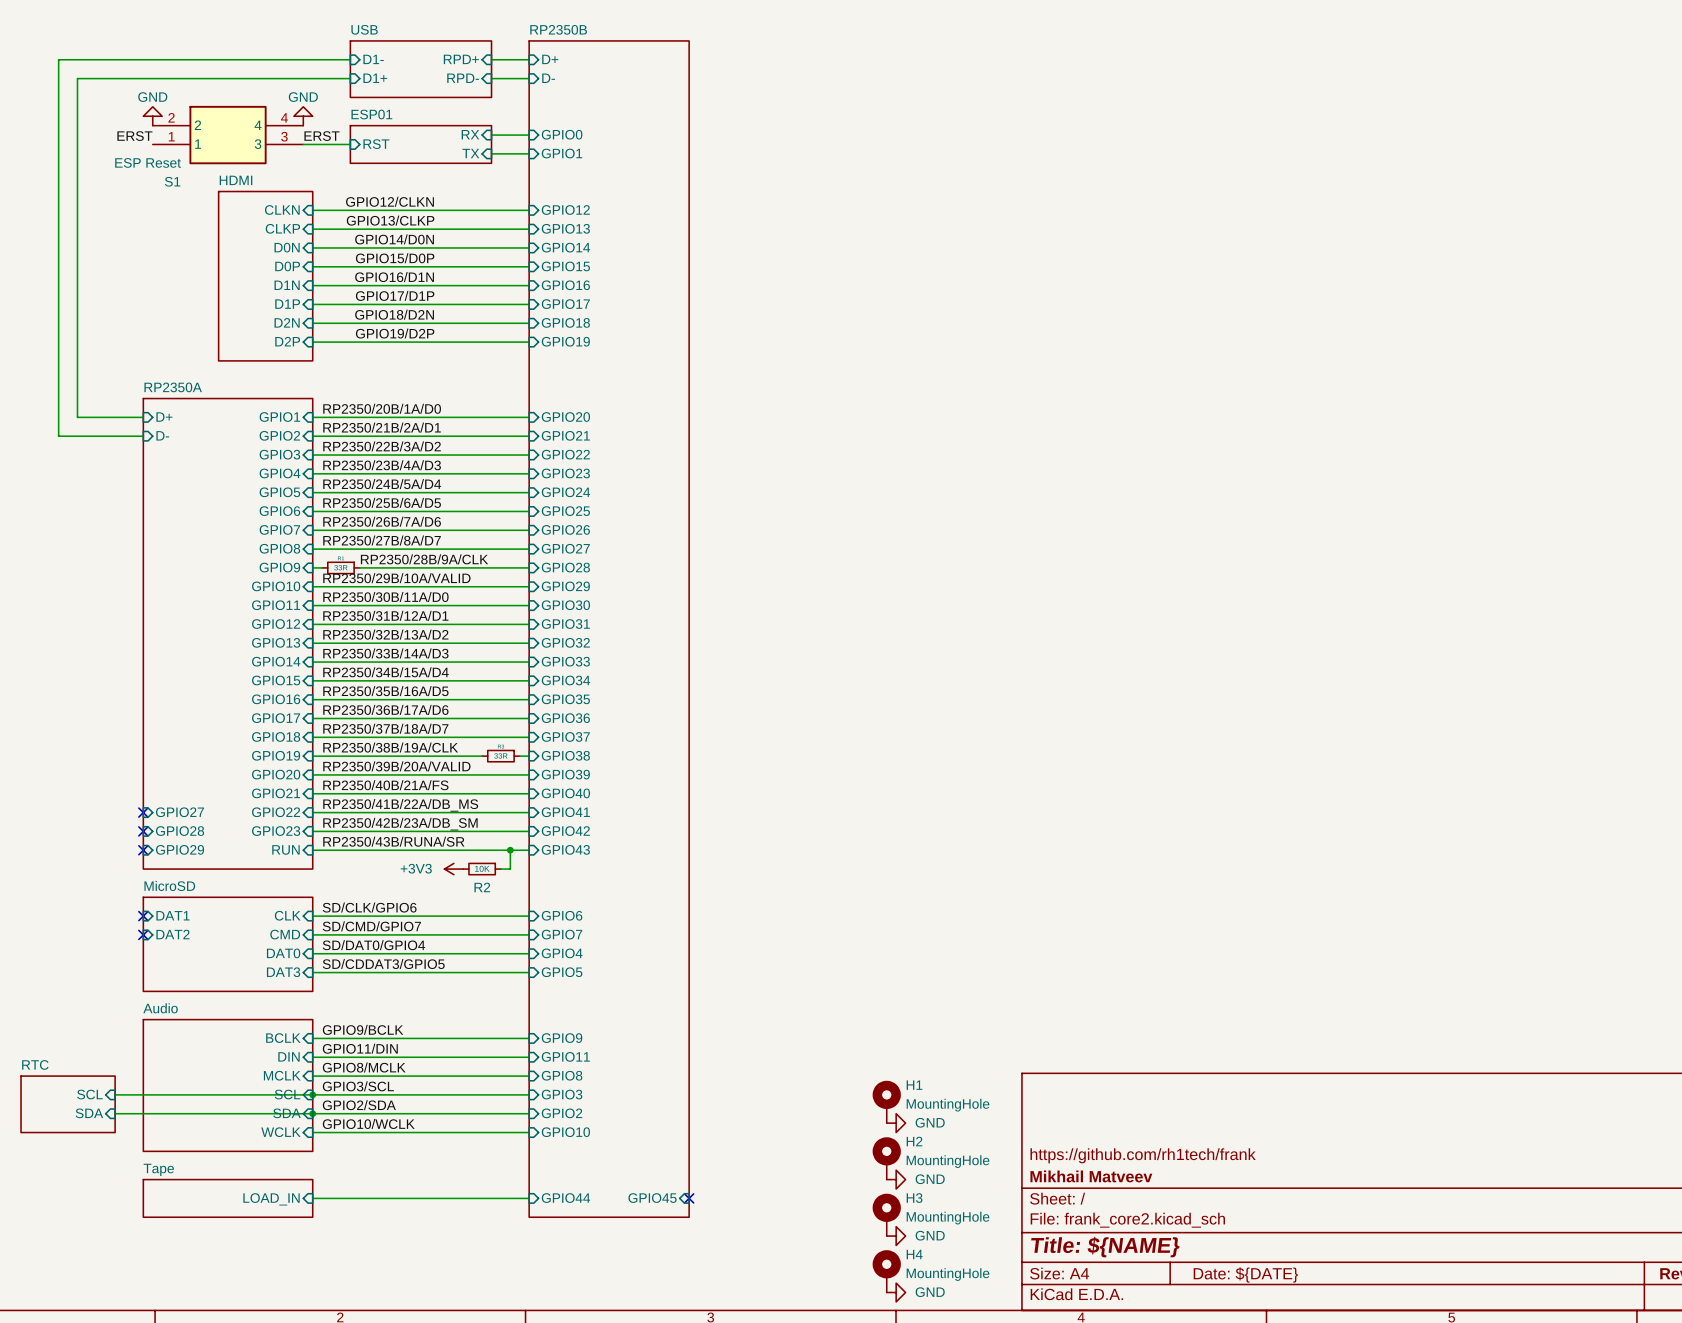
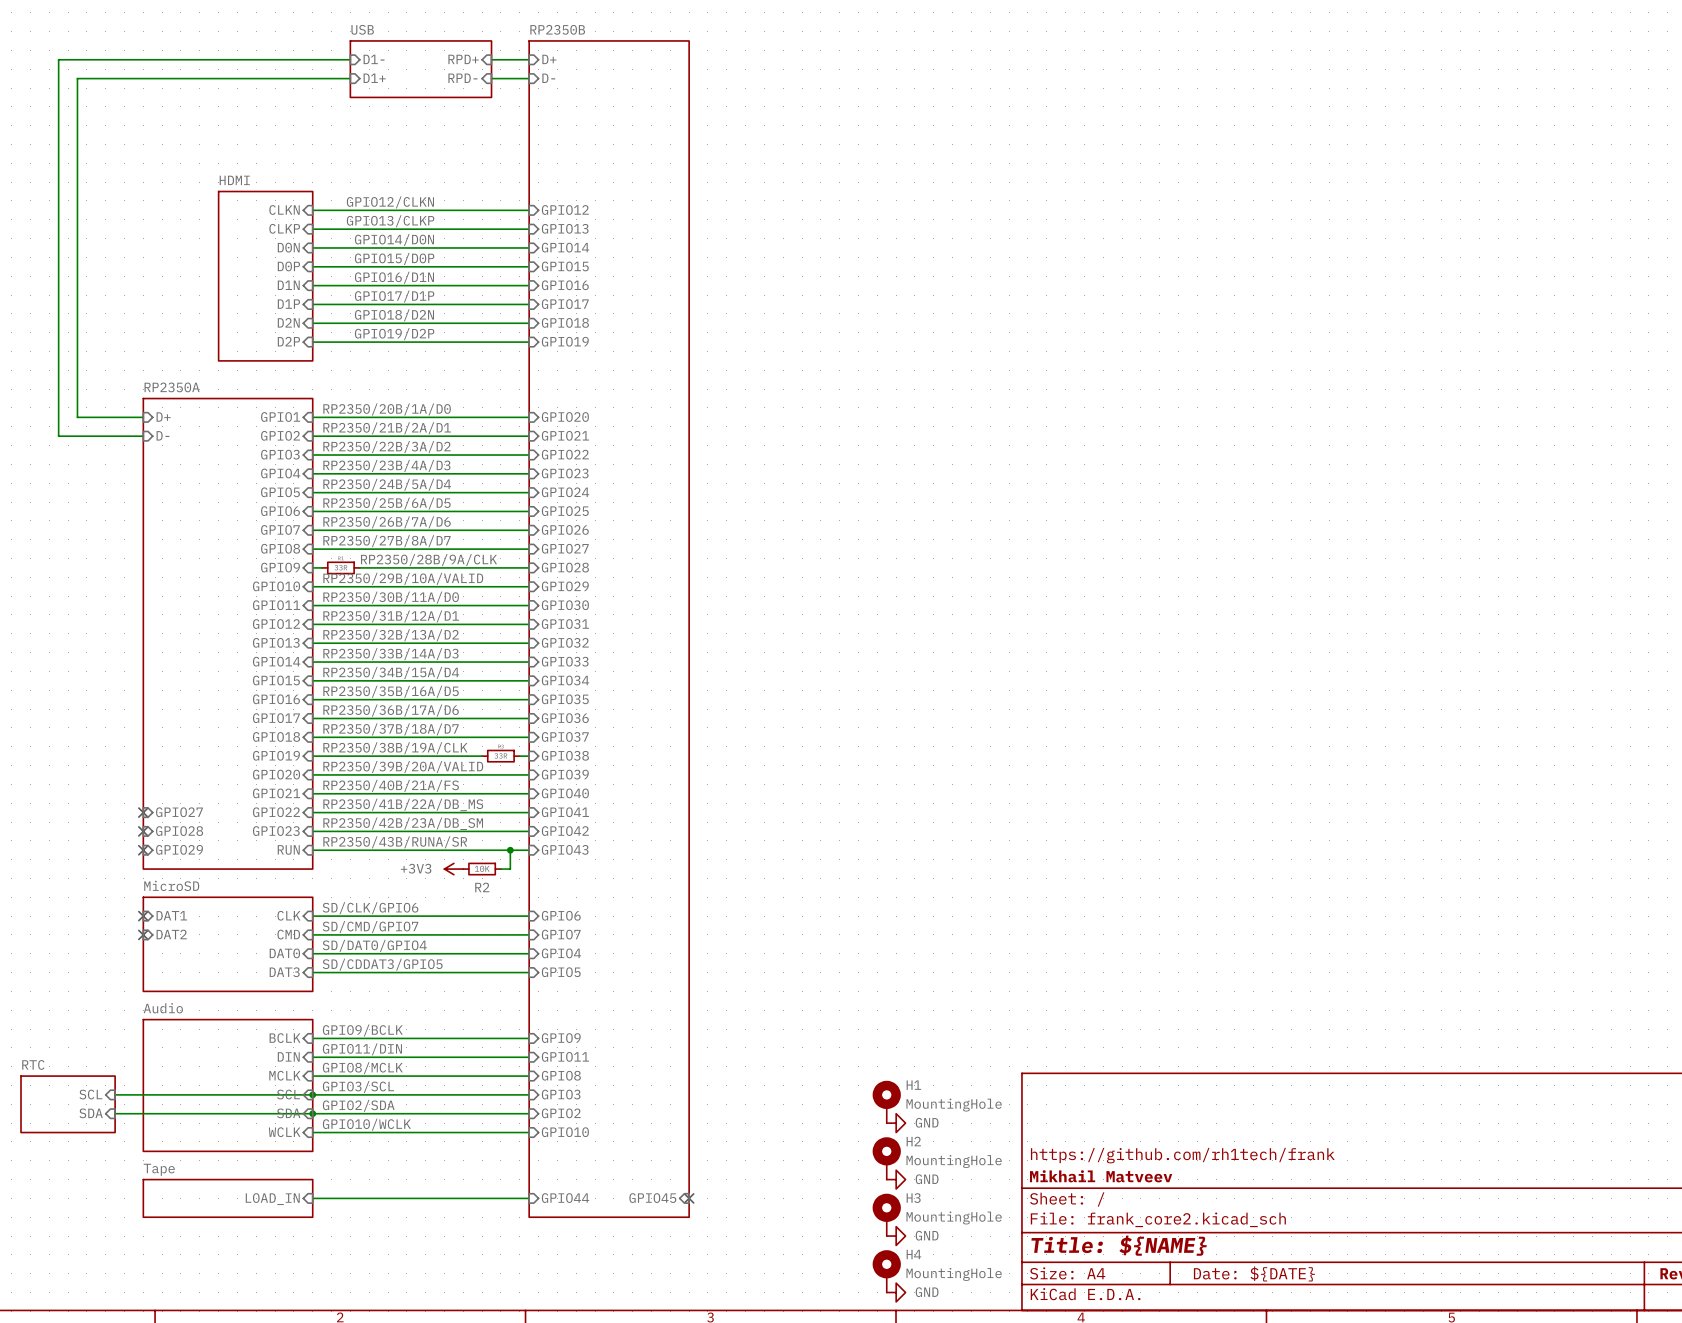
power symbol: GND (152, 116) -> none
power symbol: GND (303, 116) -> none
sheet pin: RX (470, 134) -> none
sheet pin: GPIO0 (562, 134) -> none
S1: ESP Reset (228, 135) -> none
wire: (491, 135) (529, 135) -> none
label: ERST (134, 136) -> none
label: ERST (321, 136) -> none
wire: (303, 144) (350, 144) -> none
sheet pin: RST (376, 144) -> none
sheet ESP01: (420, 144) -> none
sheet pin: TX (470, 153) -> none
wire: (491, 153) (529, 153) -> none
sheet pin: GPIO1 (562, 153) -> none

